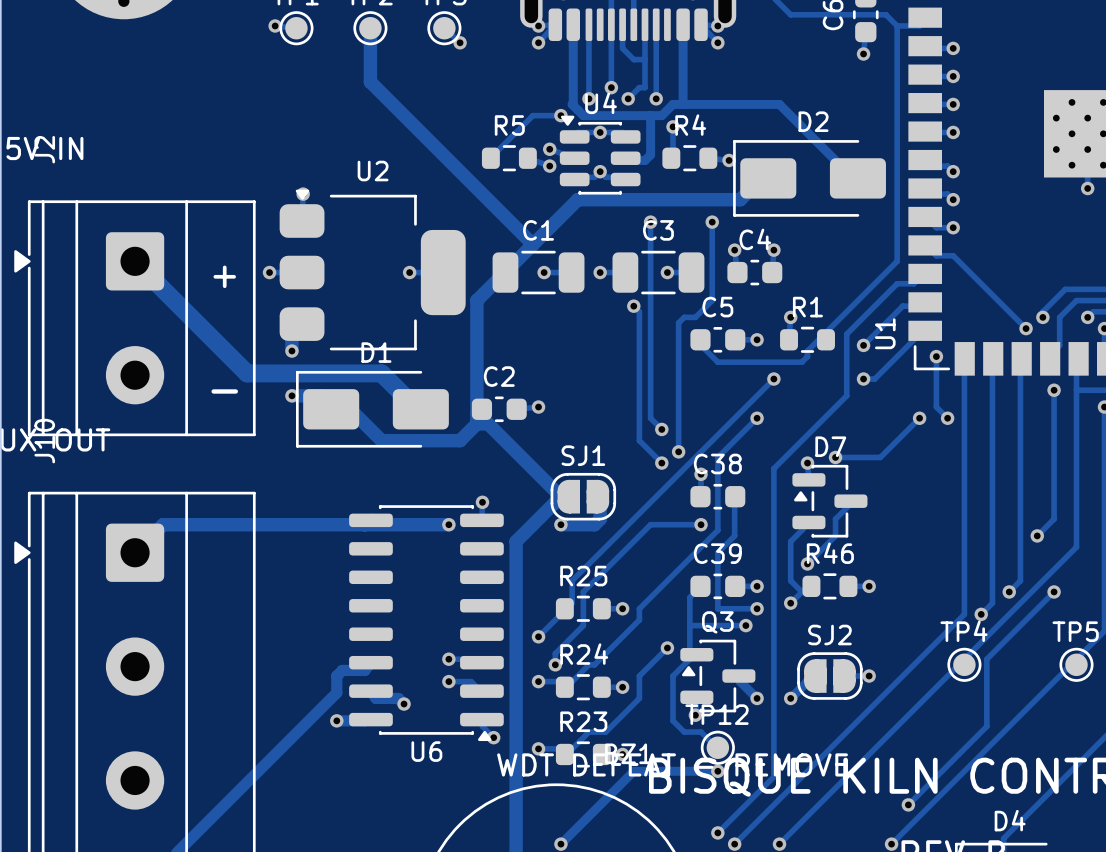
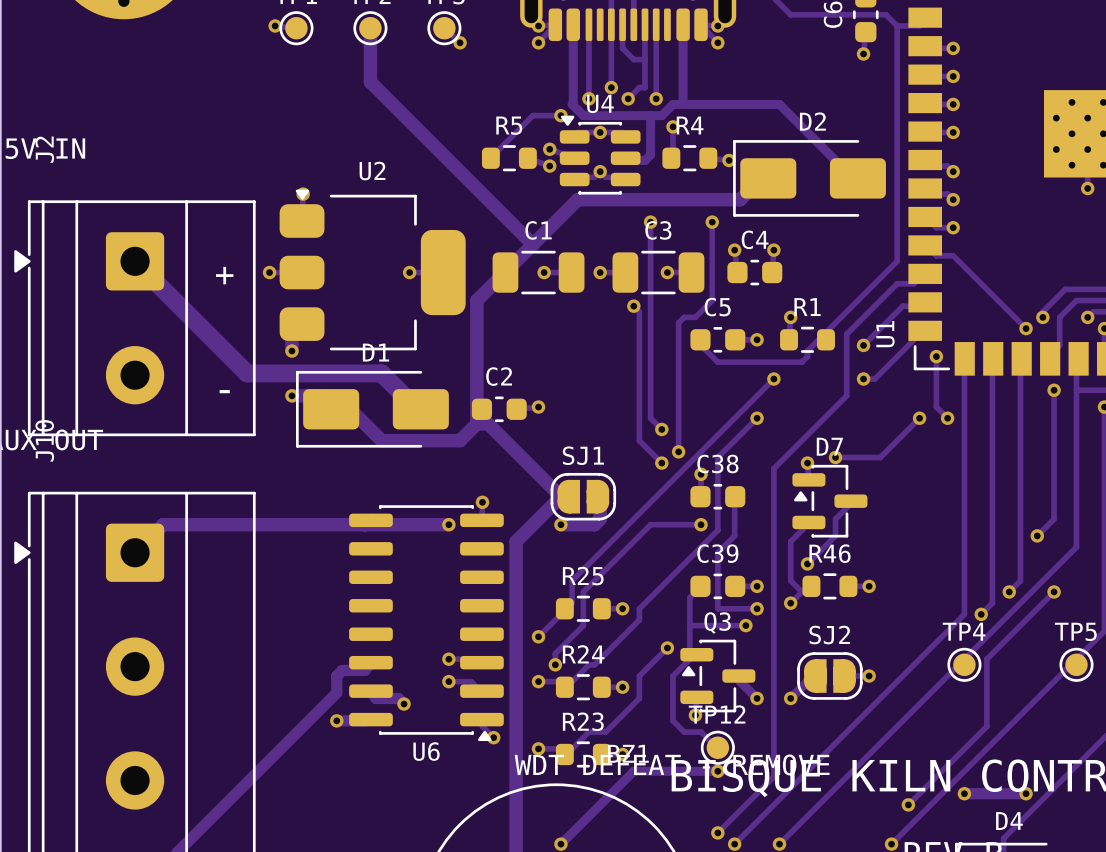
track: none -> (964, 793) (1026, 793)
via: none -> (964, 793)
via: none -> (1026, 793)

